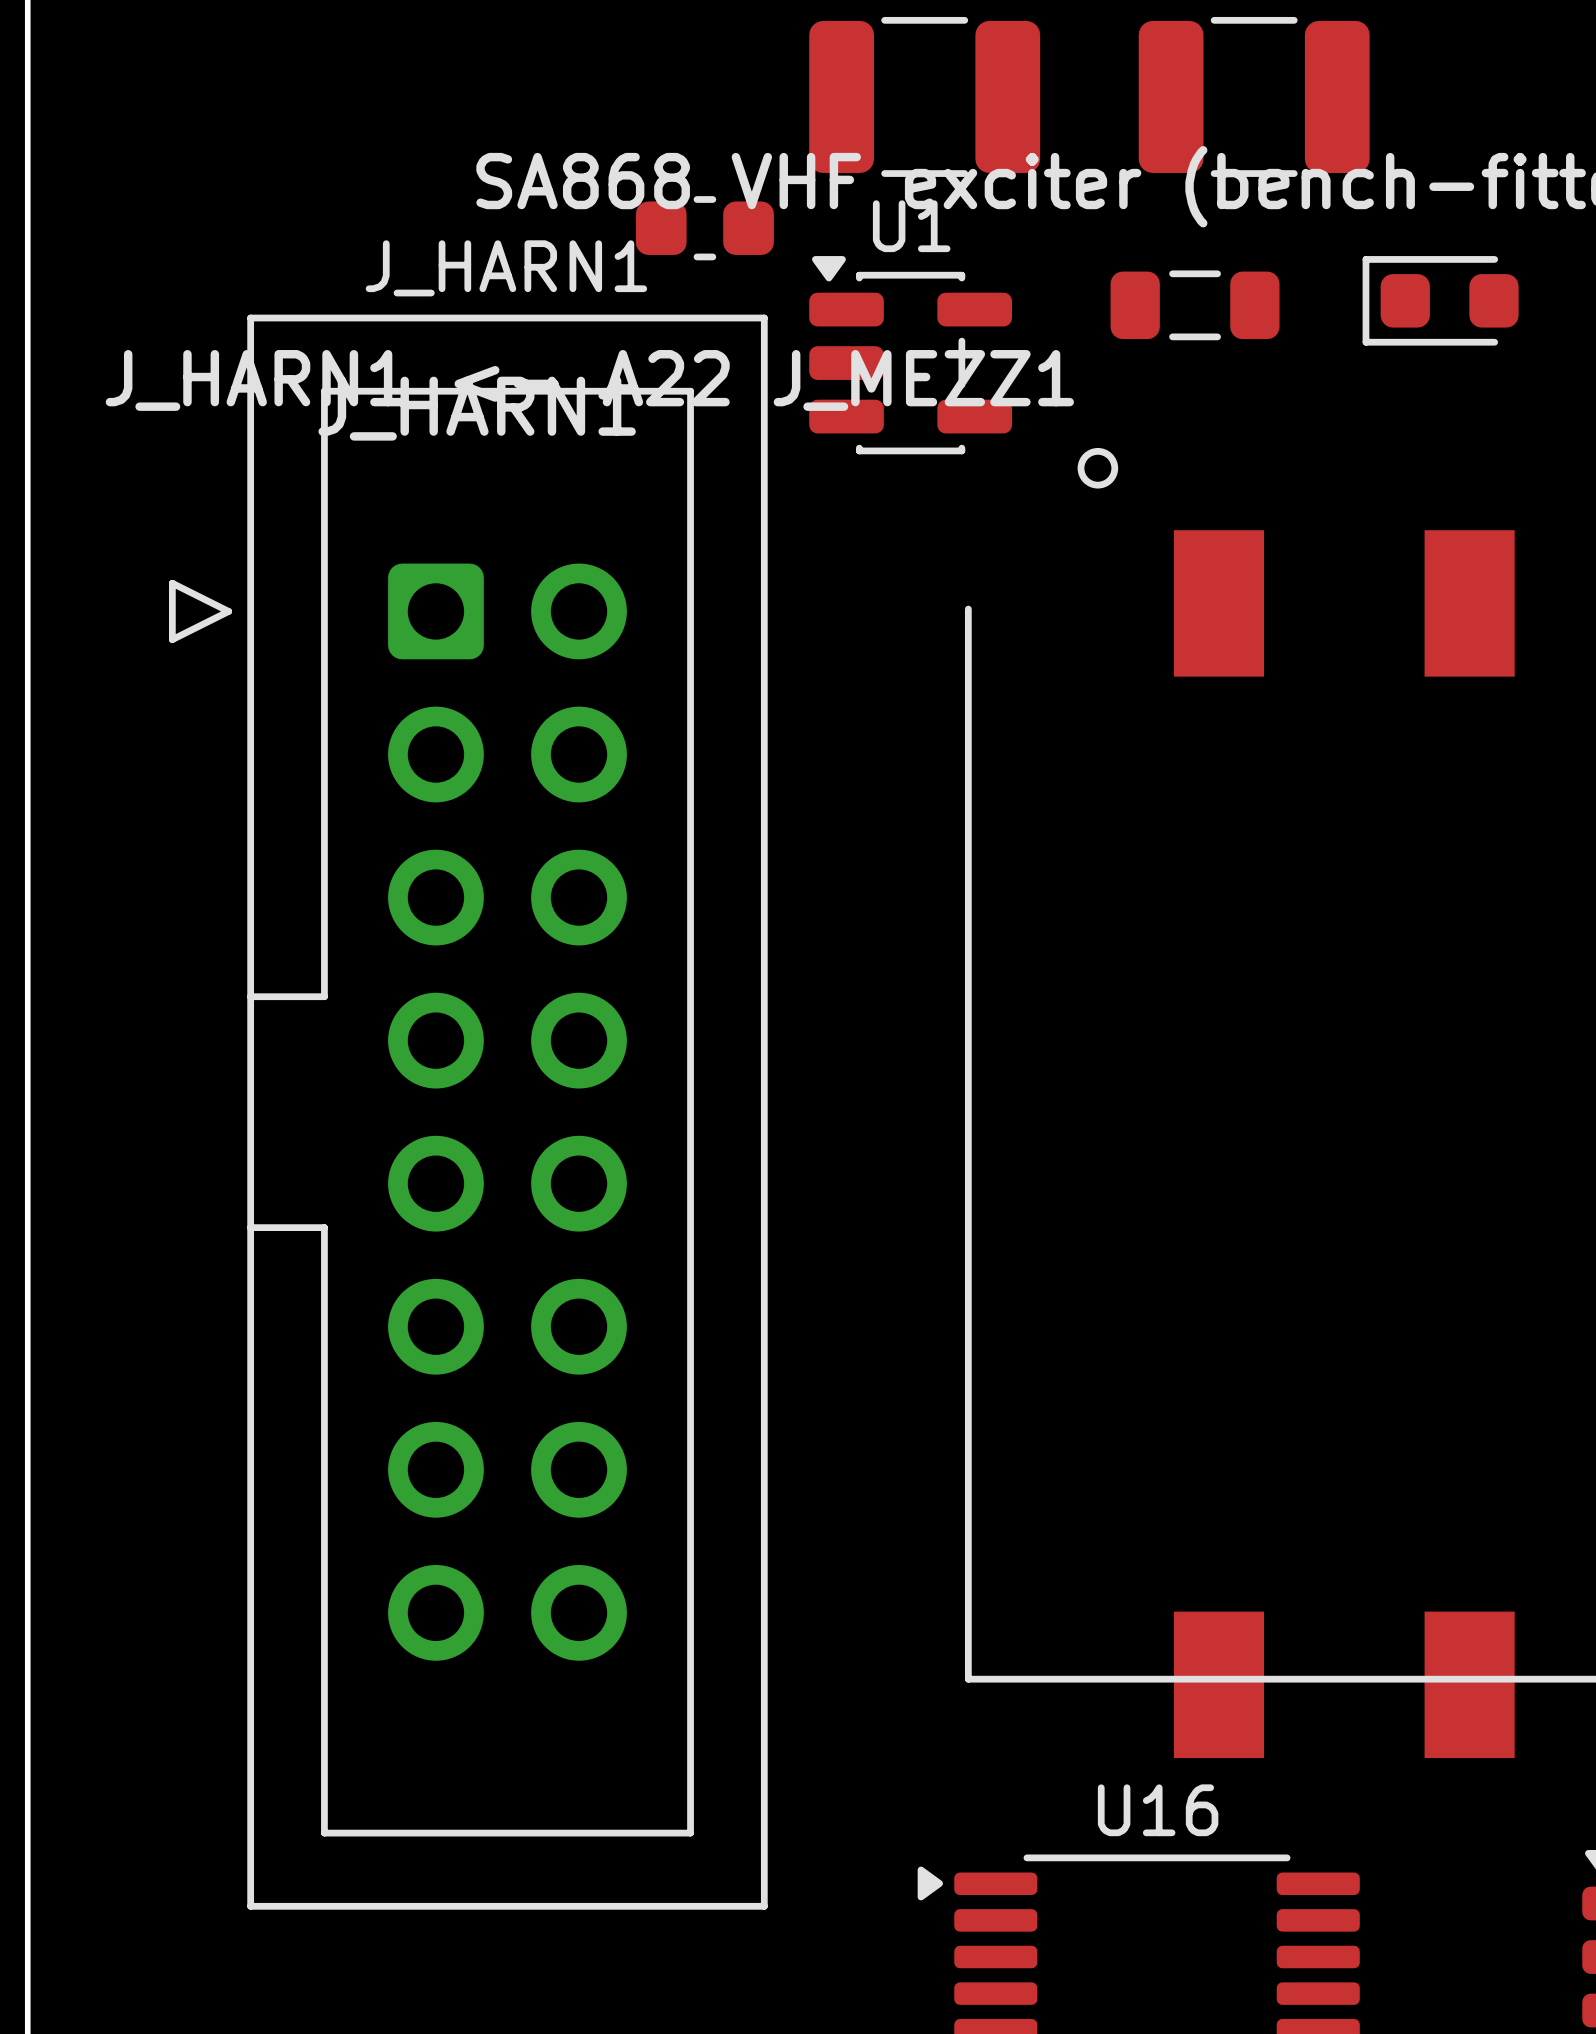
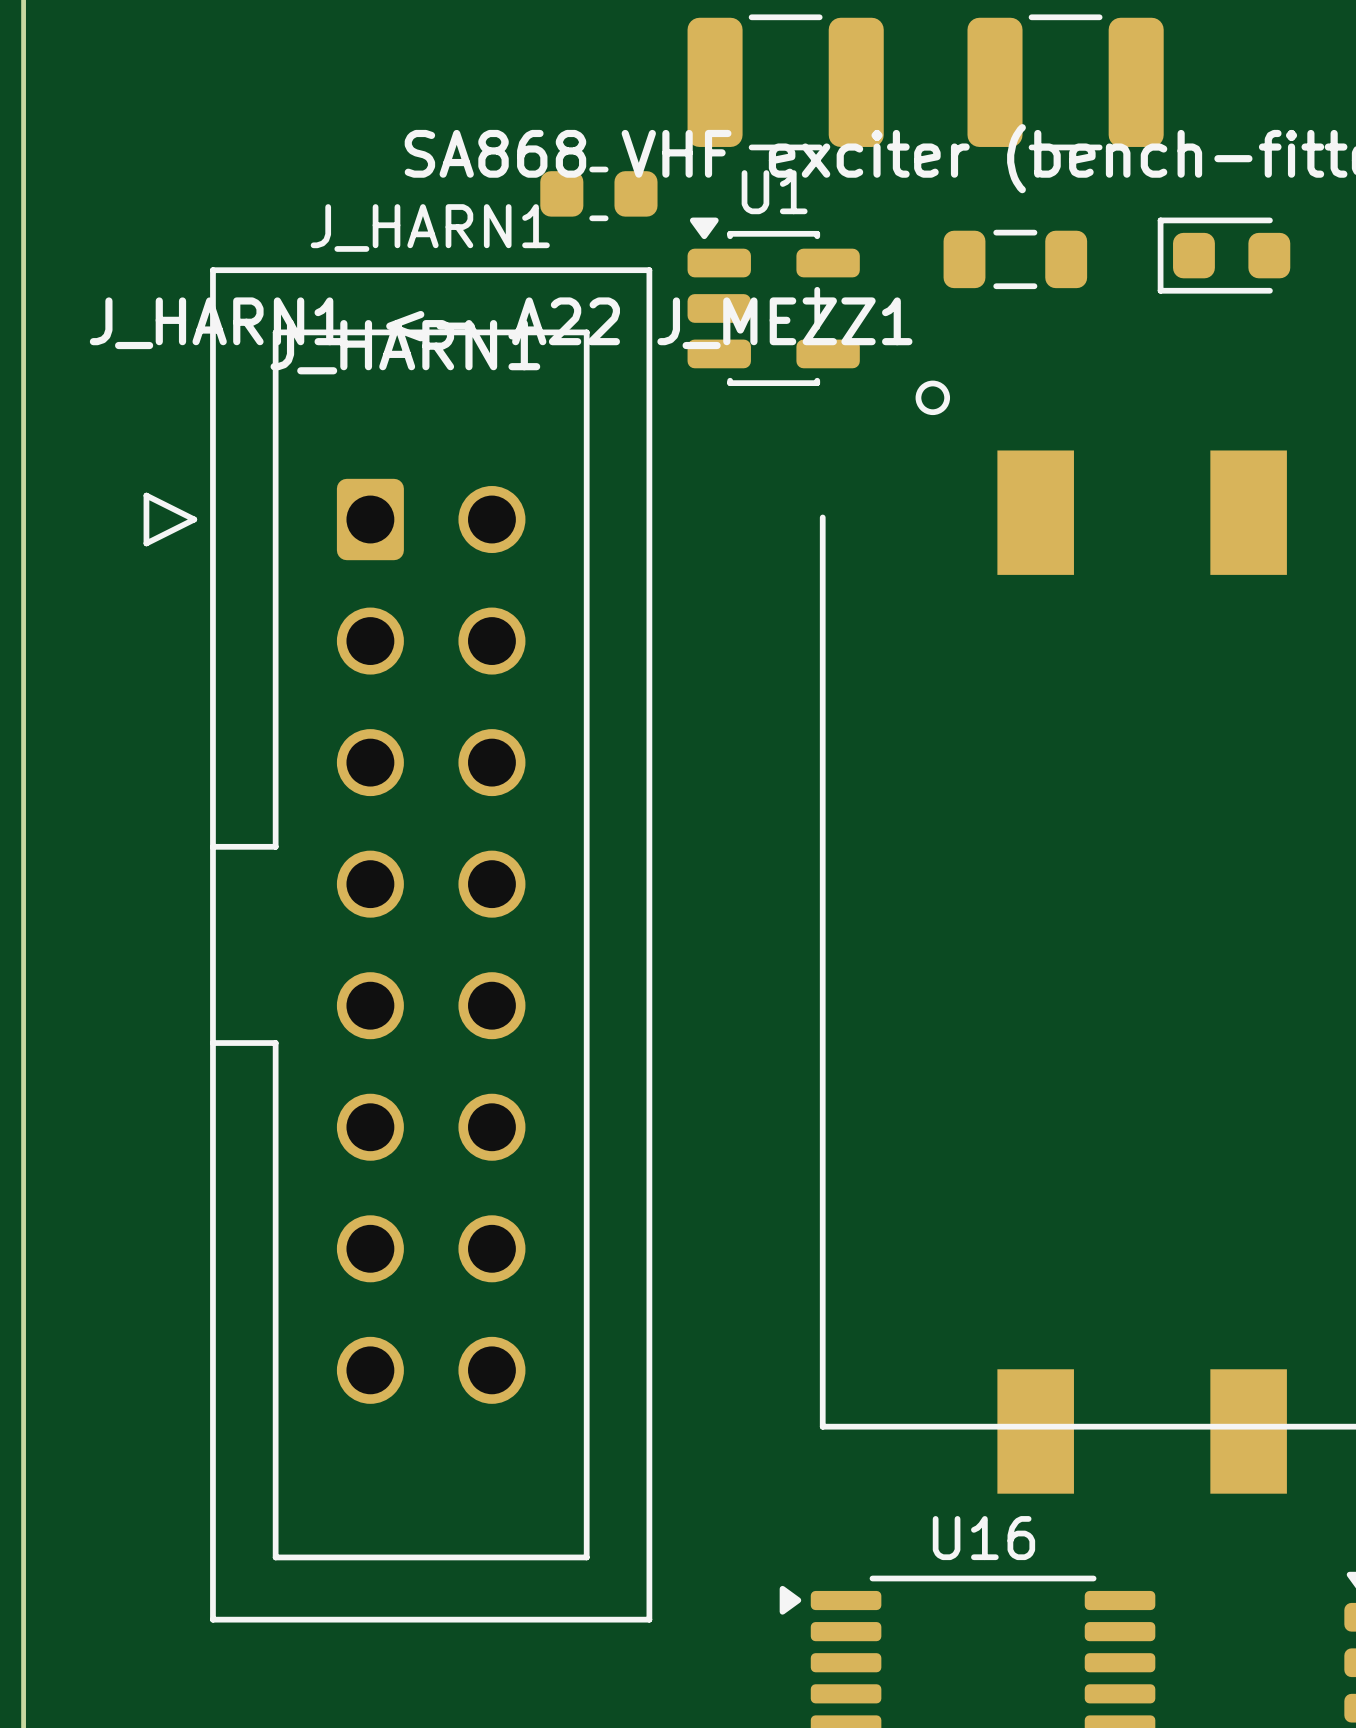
J_HARN1 footprint: [168, 314, 768, 1910] -> [143, 267, 653, 1623]

